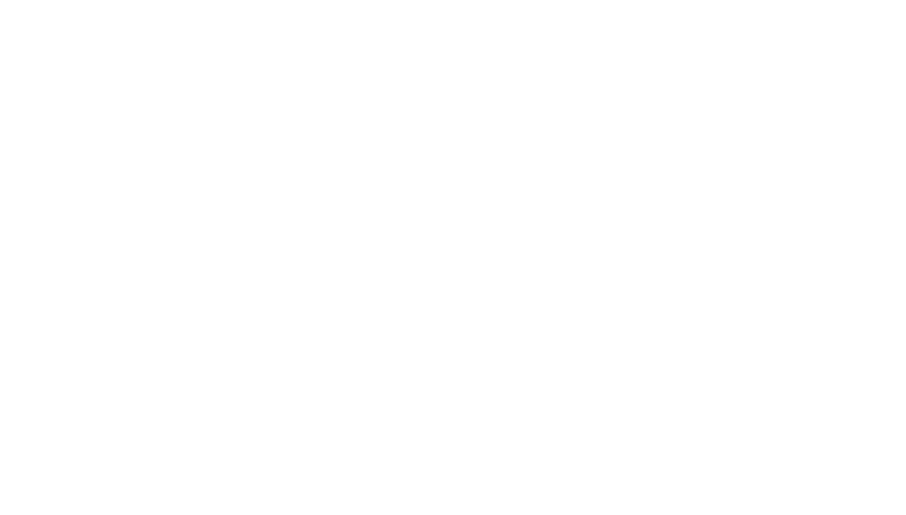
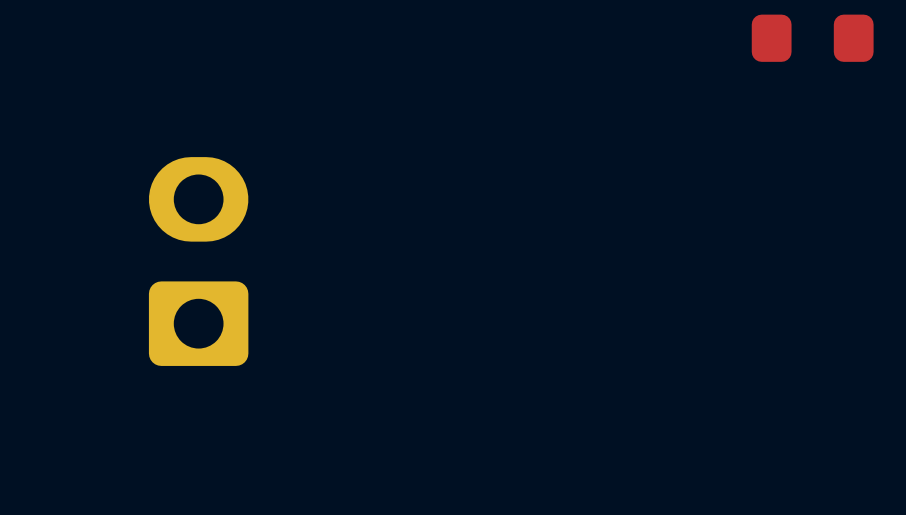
part: none -> (812, 38)
part: none -> (198, 261)

